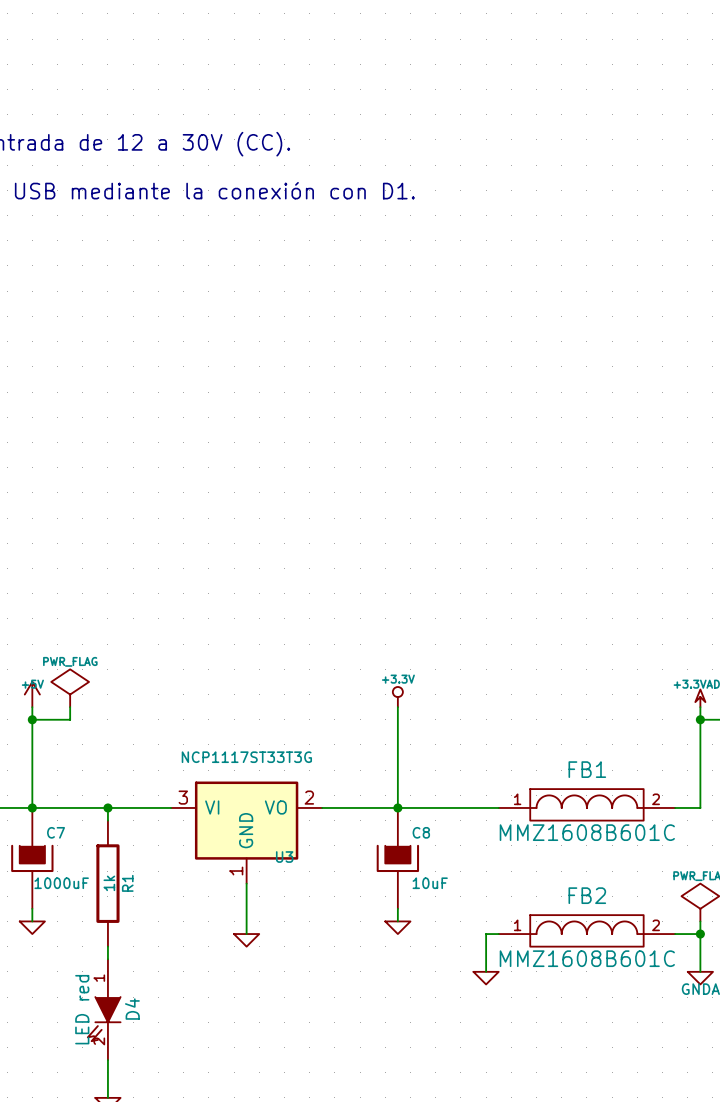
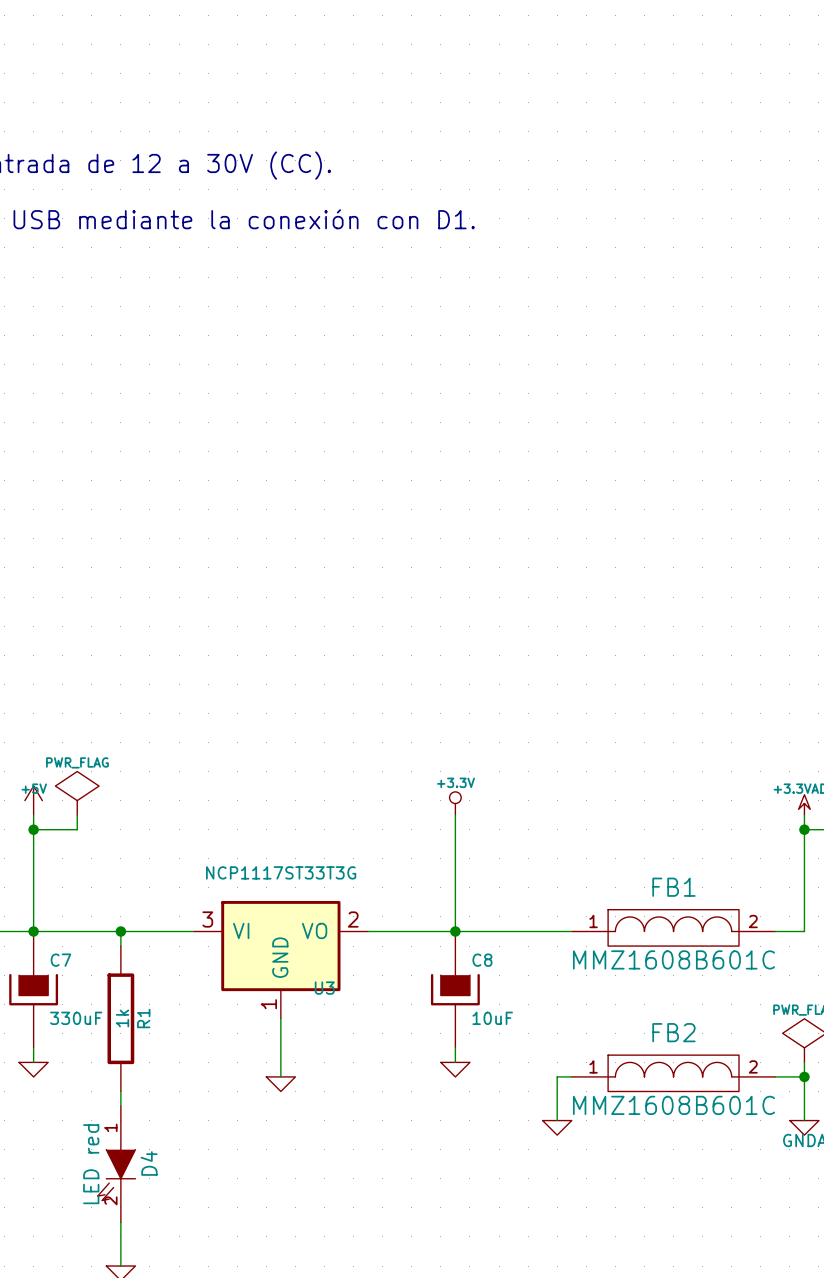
C7 value: 1000uF (61, 883) -> 330uF (76, 1018)

